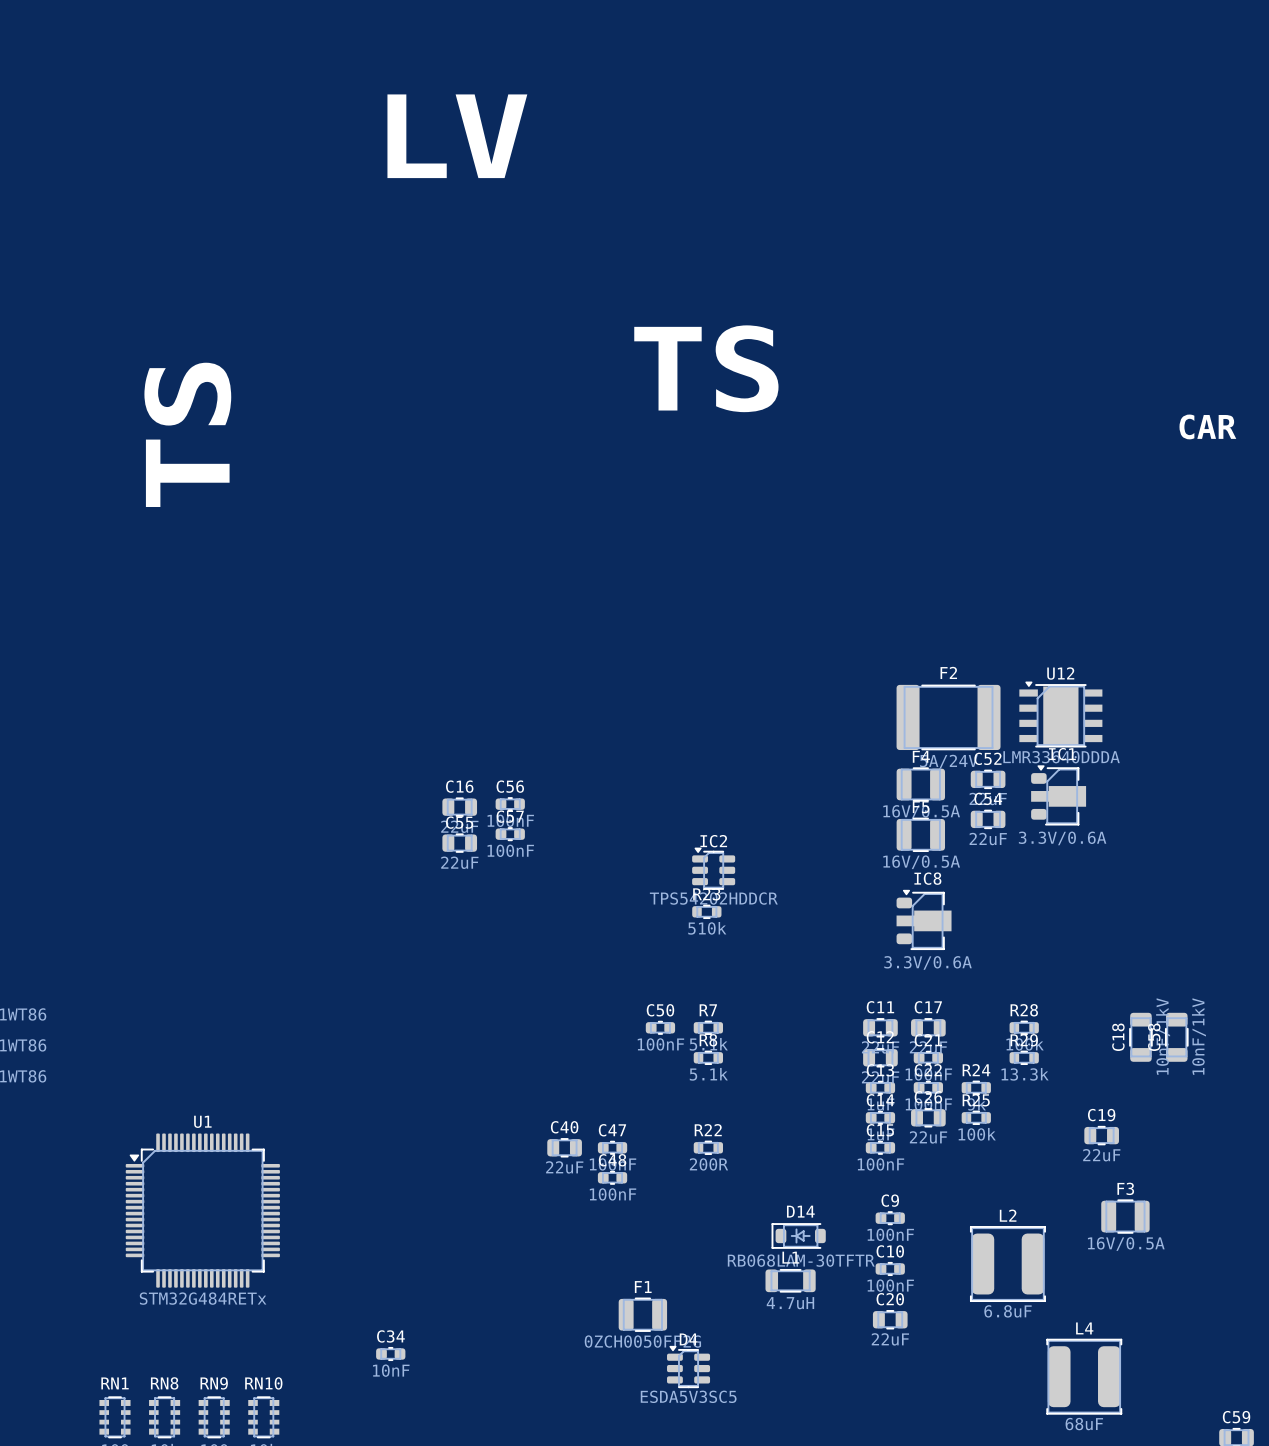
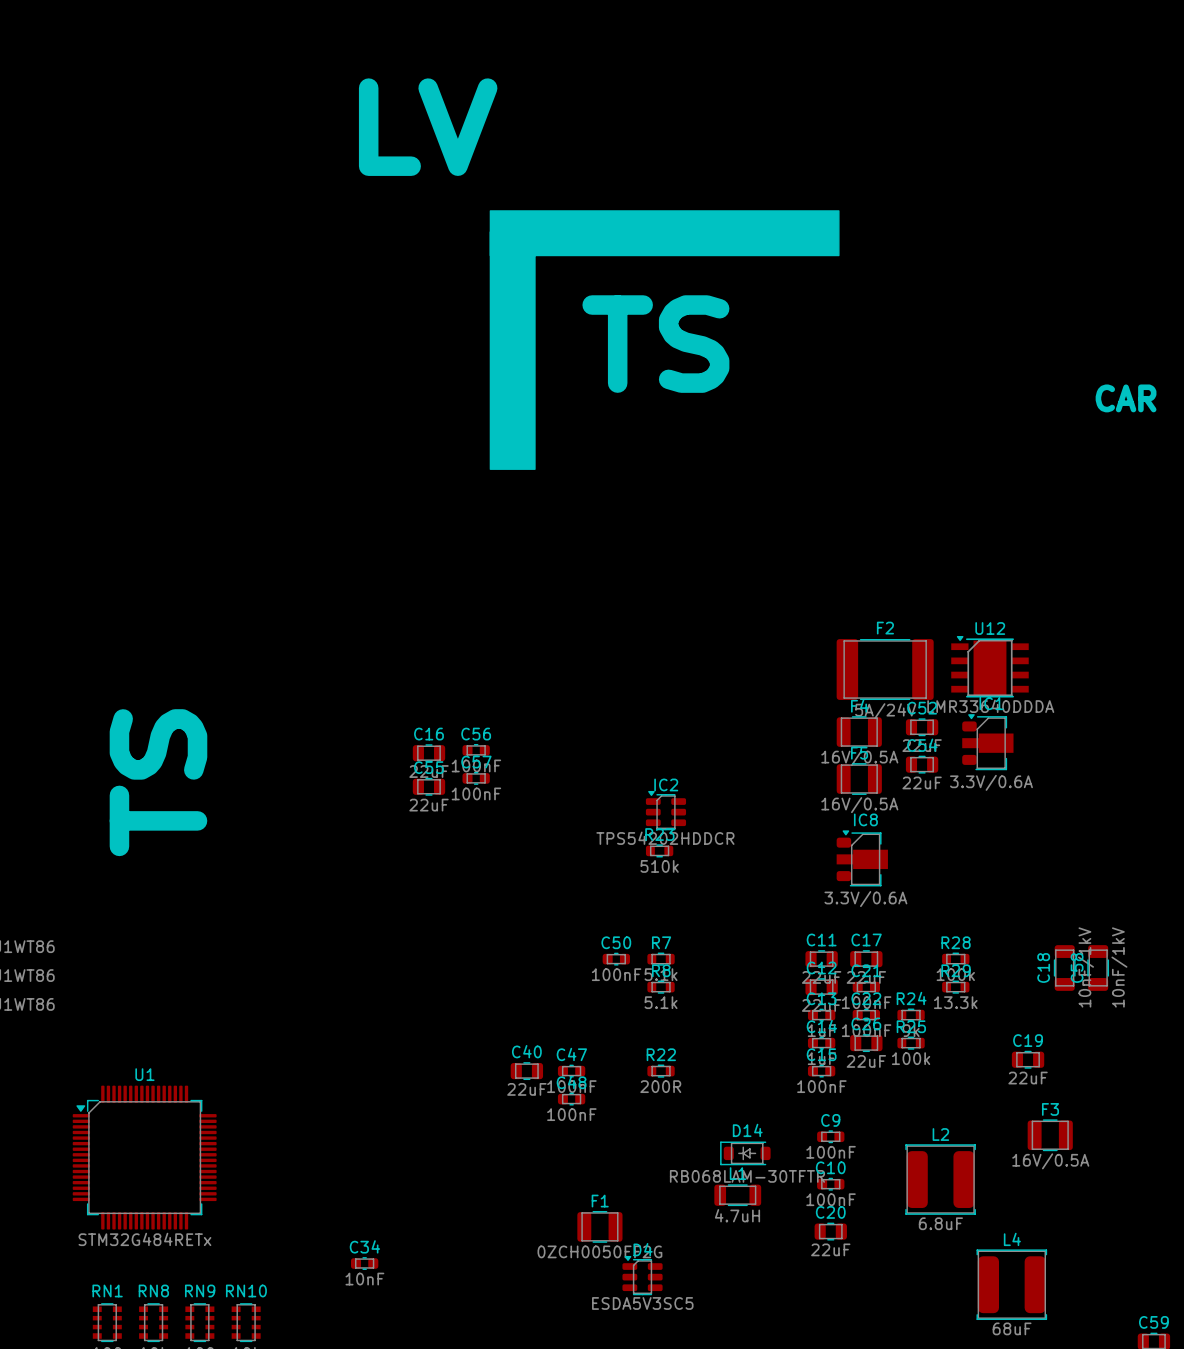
drawing: none -> [489, 210, 840, 470]
text: TS (187, 434) -> none
text: none -> TS (158, 782)
U1 position: (202, 1210) -> (144, 1157)

